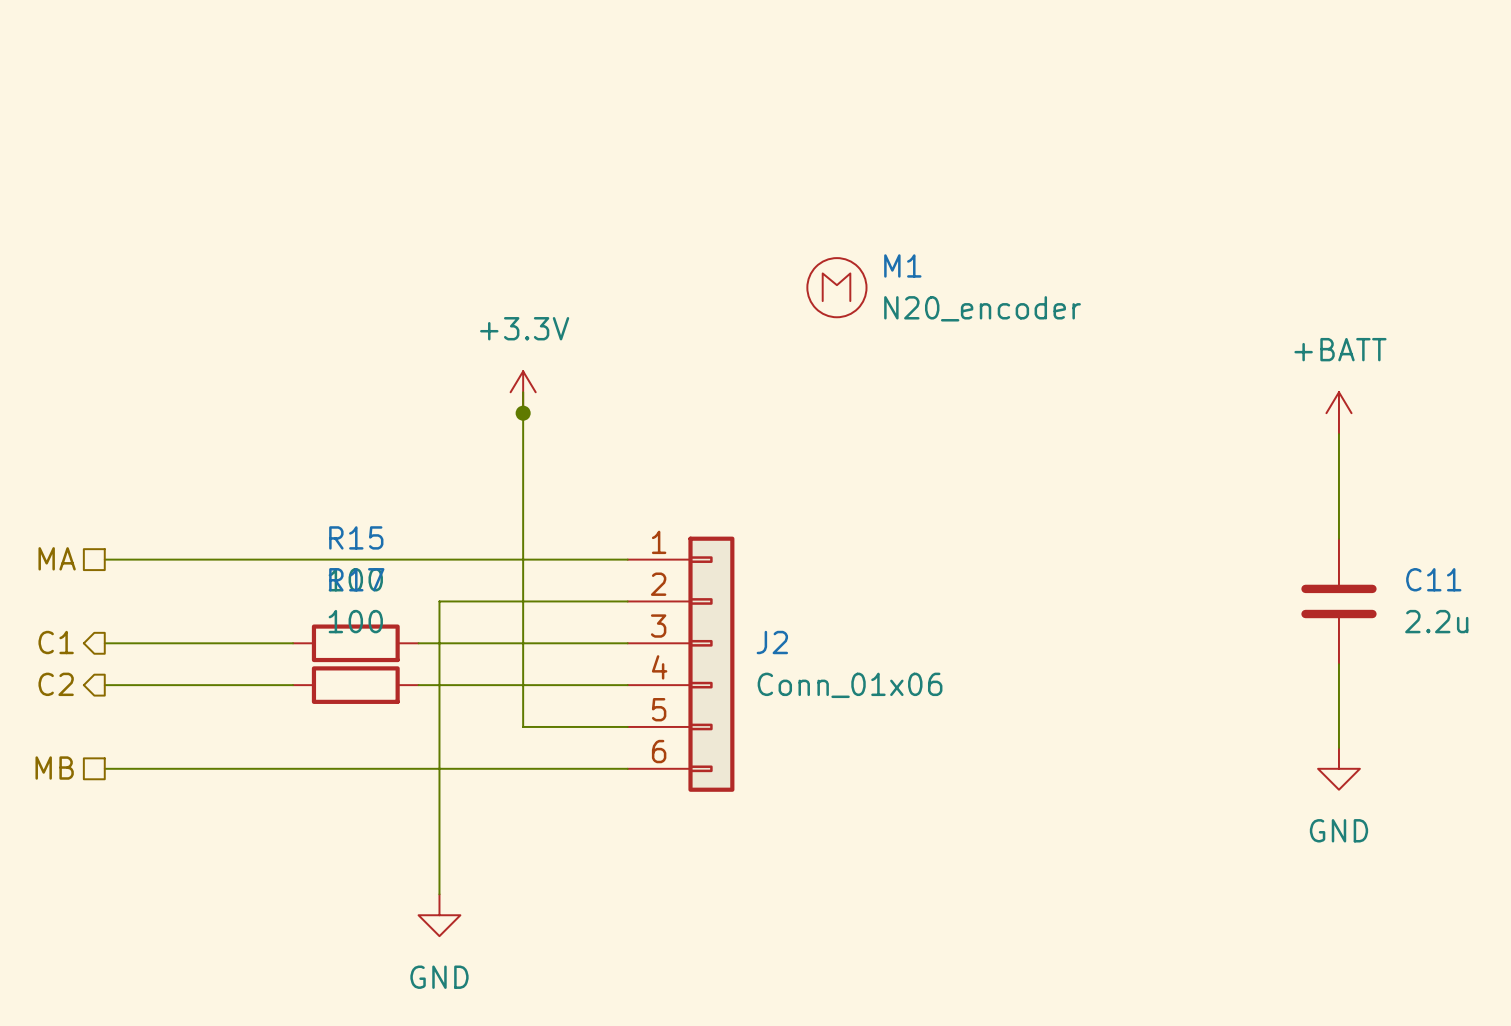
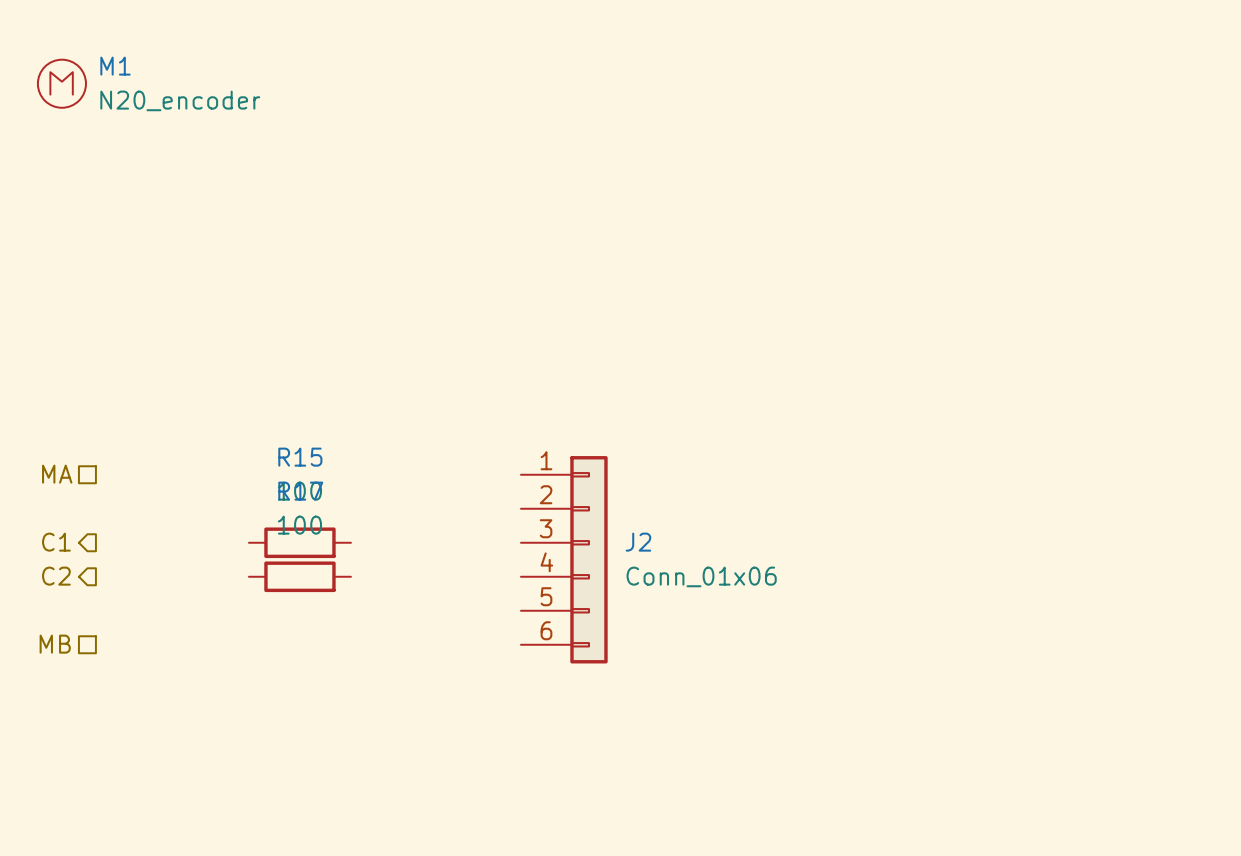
M1 position: (836, 287) -> (61, 83)
wire: (523, 392) (523, 726) (627, 726) -> none
power symbol: +3.3V (523, 392) -> none
junction: (523, 413) -> none
power symbol: +BATT (1338, 413) -> none
wire: (1338, 434) (1338, 538) -> none
wire: (104, 559) (627, 559) -> none
wire: (627, 601) (439, 601) (439, 894) -> none
C11: 2.2u (1338, 601) -> none
wire: (104, 643) (293, 643) -> none
wire: (418, 643) (627, 643) -> none
wire: (1338, 664) (1338, 747) -> none
wire: (104, 685) (293, 685) -> none
wire: (418, 685) (627, 685) -> none
wire: (104, 768) (627, 768) -> none
power symbol: GND (1338, 768) -> none
power symbol: GND (439, 915) -> none

